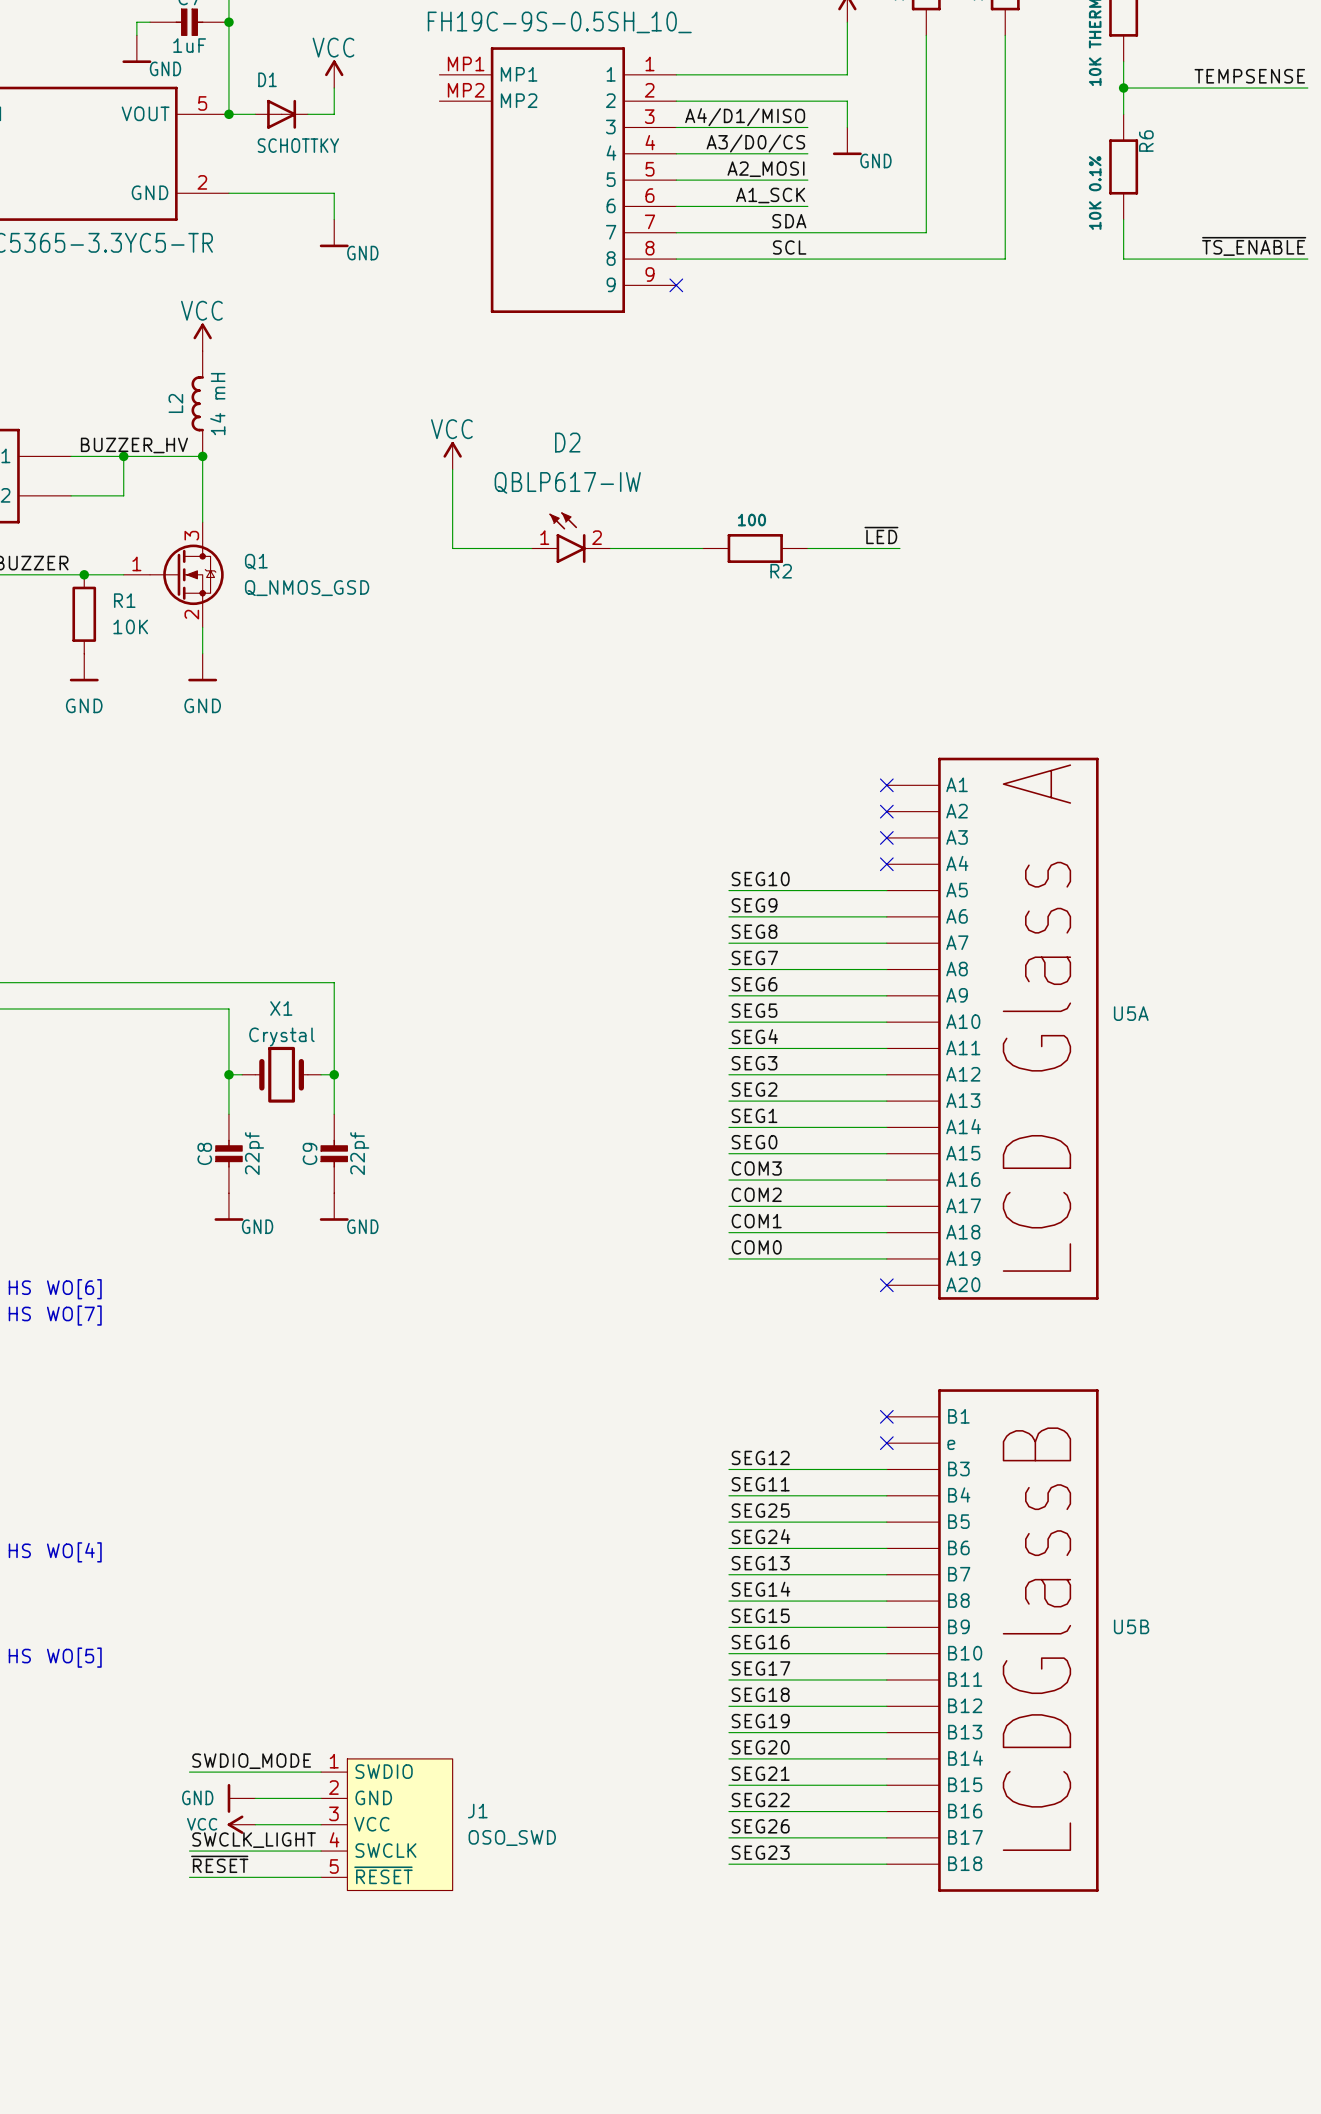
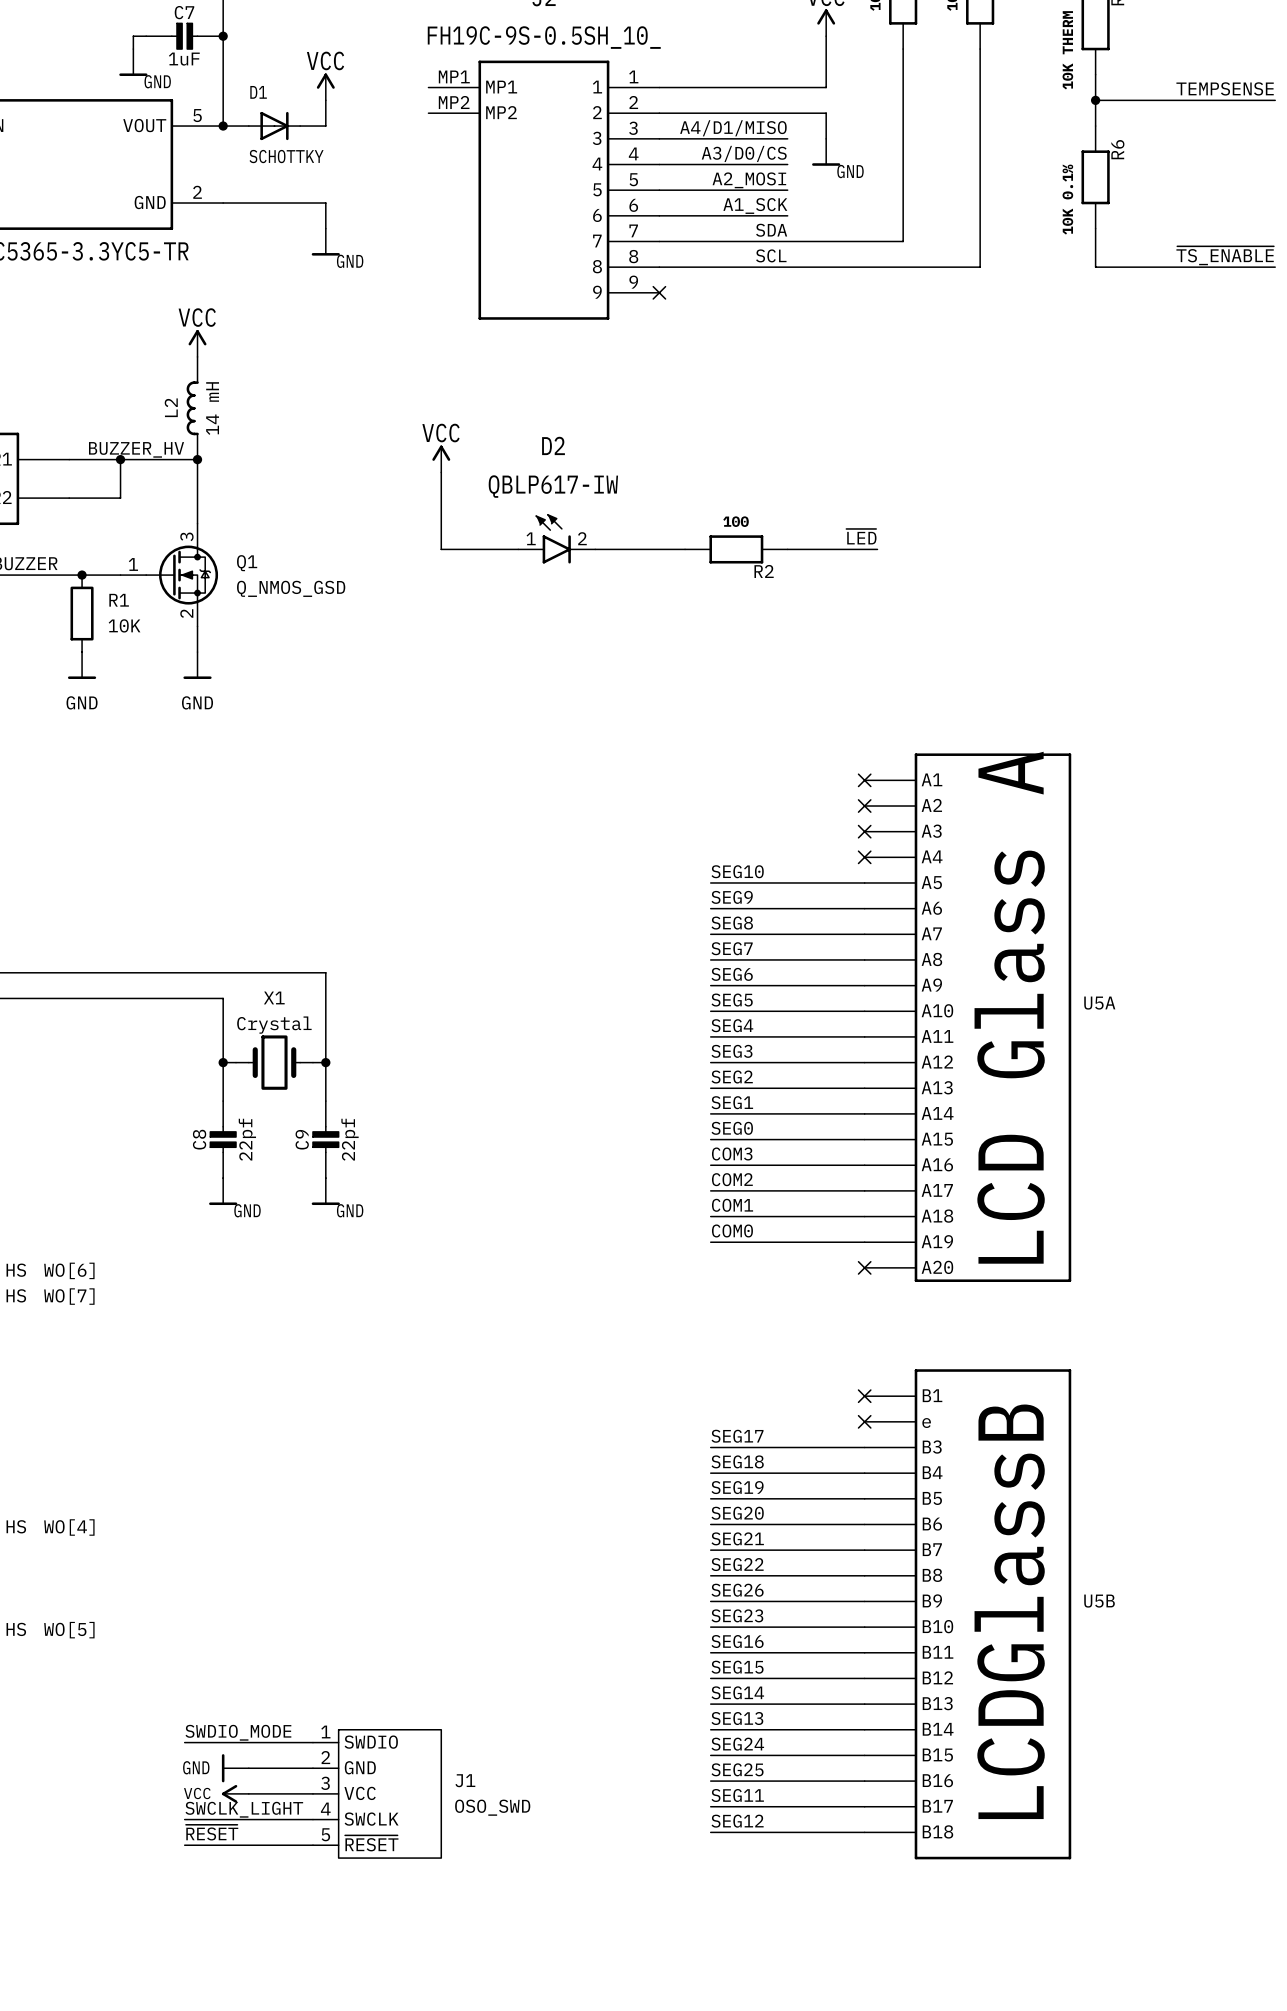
label: SEG12 (760, 1457) -> SEG17 (737, 1436)
label: SEG11 (760, 1484) -> SEG18 (737, 1461)
label: SEG25 (760, 1510) -> SEG19 (737, 1487)
label: SEG24 (760, 1536) -> SEG20 (737, 1513)
label: SEG13 (760, 1563) -> SEG21 (737, 1538)
label: SEG14 (760, 1589) -> SEG22 (737, 1564)
label: SEG15 (760, 1615) -> SEG26 (737, 1590)
label: SEG16 (760, 1642) -> SEG23 (737, 1615)
label: SEG17 (760, 1668) -> SEG16 (737, 1641)
label: SEG18 (760, 1694) -> SEG15 (737, 1667)
label: SEG19 (760, 1721) -> SEG14 (737, 1692)
label: SEG20 (760, 1747) -> SEG13 (737, 1718)
label: SEG21 (760, 1773) -> SEG24 (737, 1744)
label: SEG22 (760, 1800) -> SEG25 (737, 1769)
label: SEG26 (760, 1826) -> SEG11 (737, 1795)
label: SEG23 (760, 1852) -> SEG12 (737, 1821)

